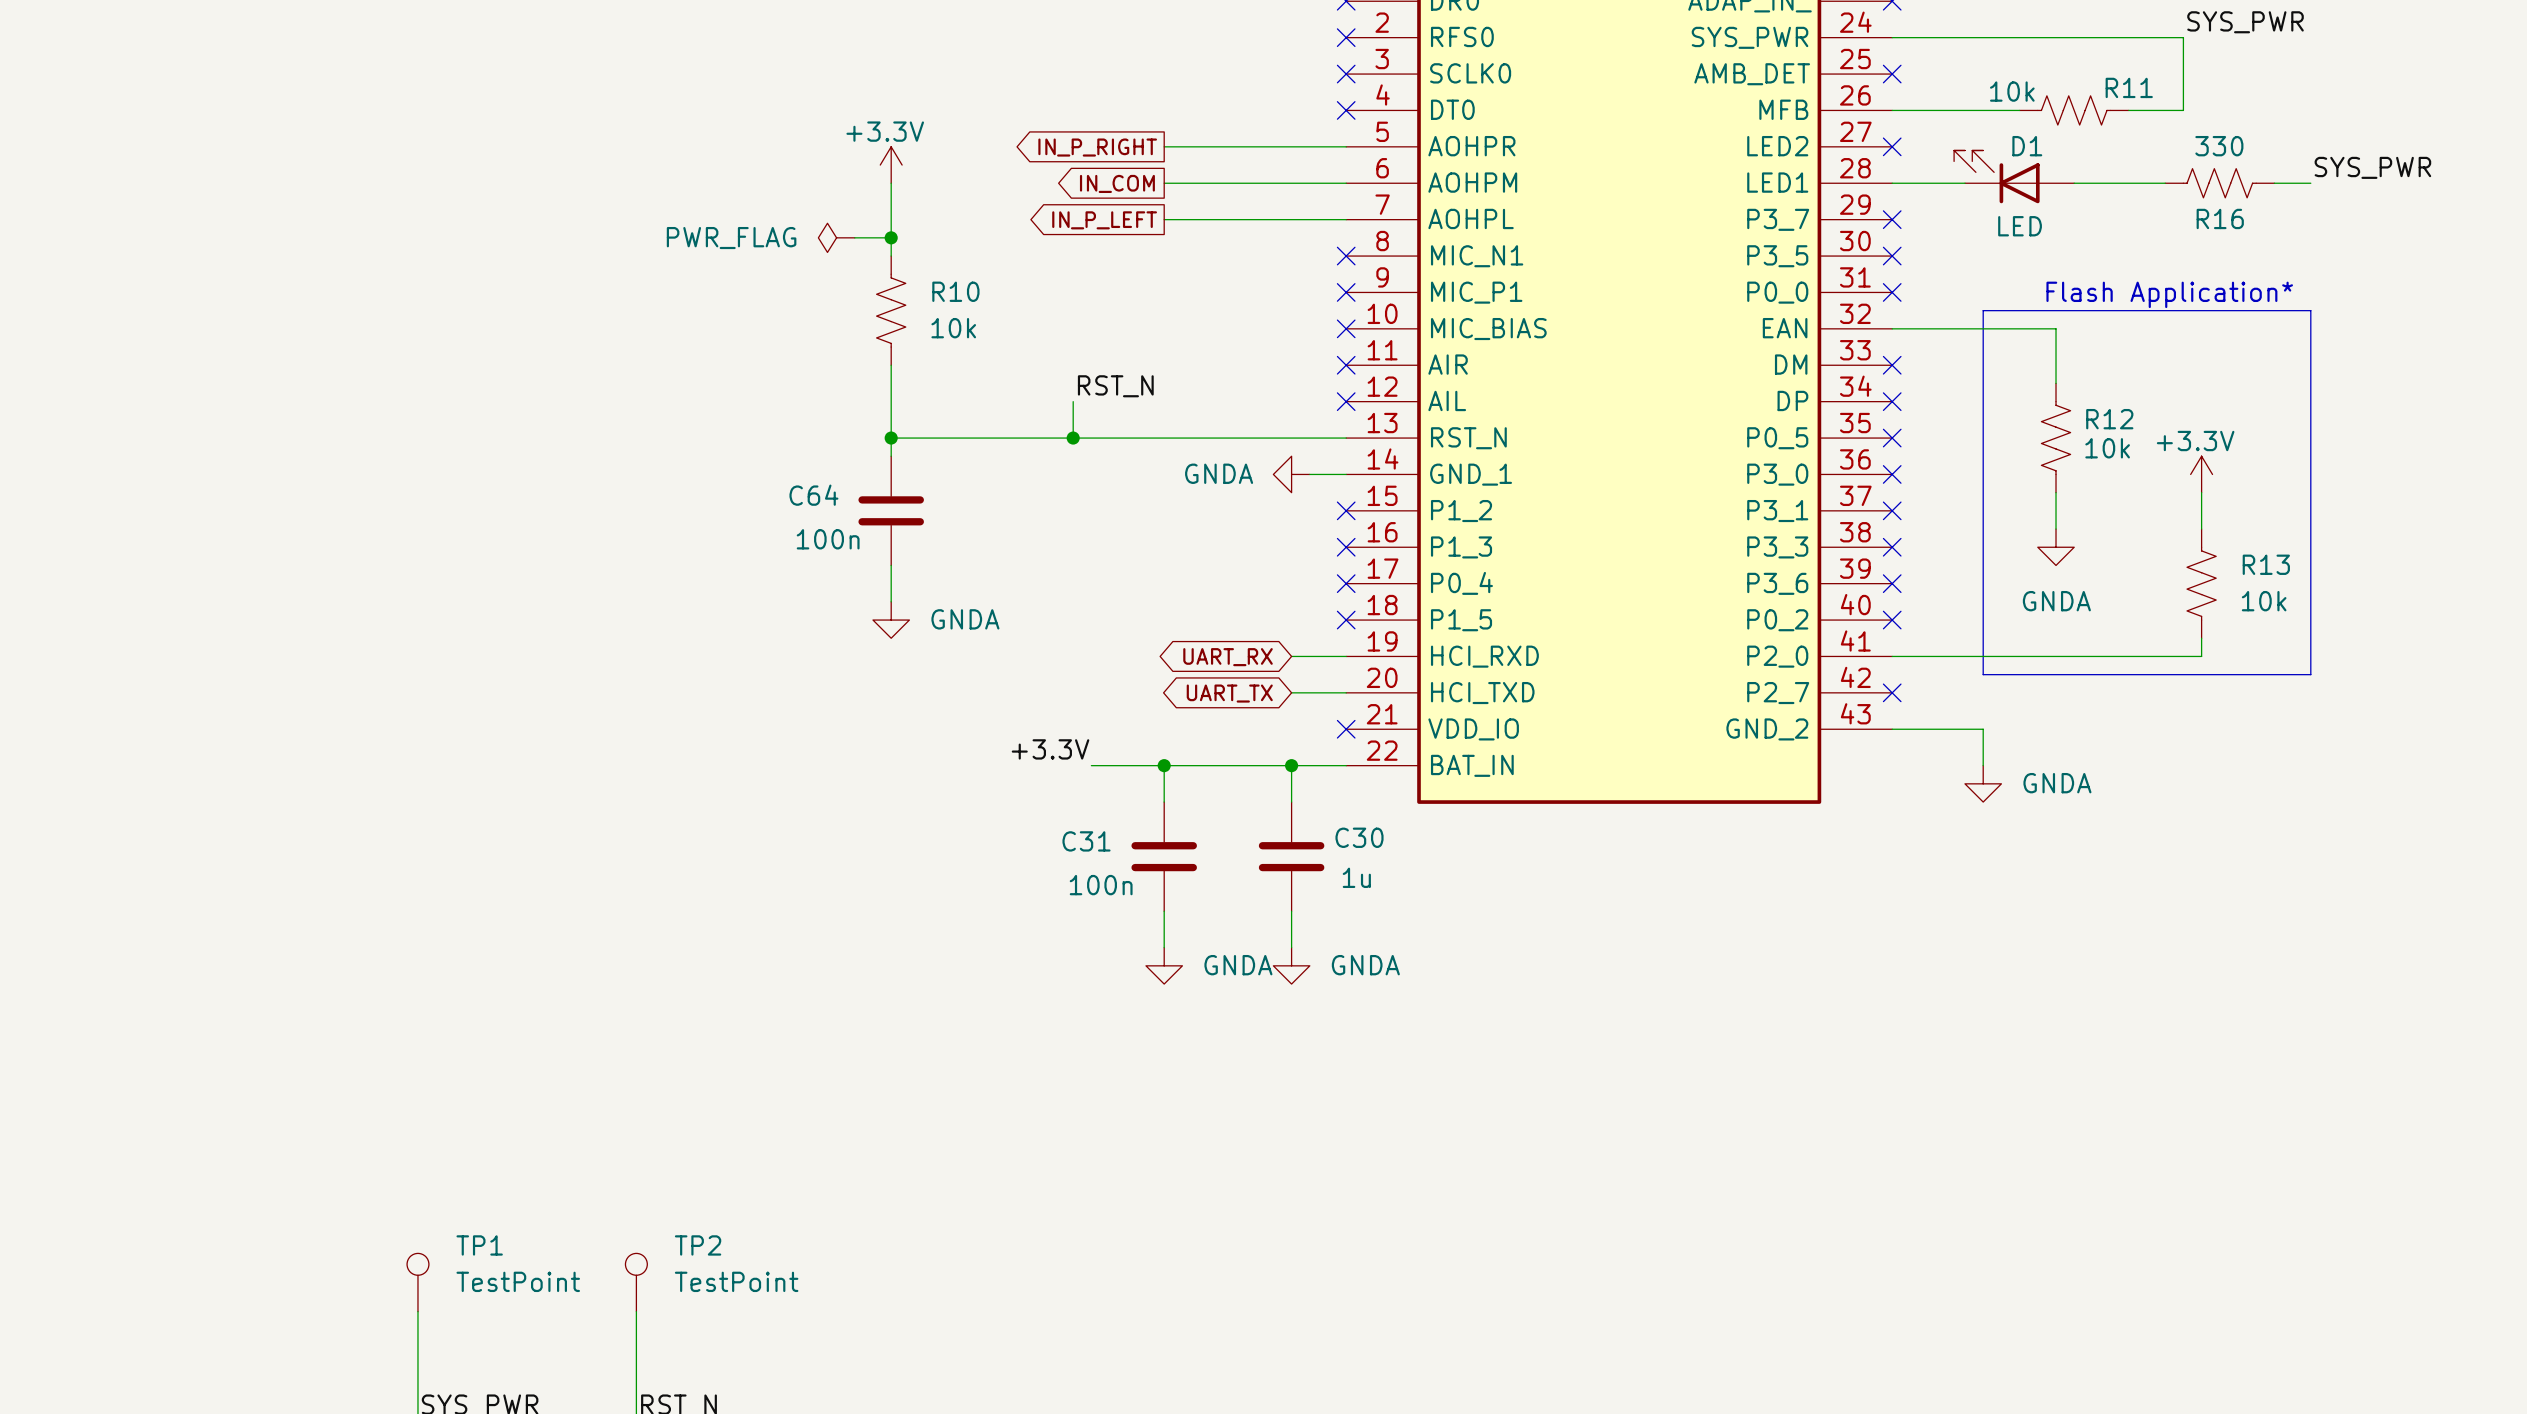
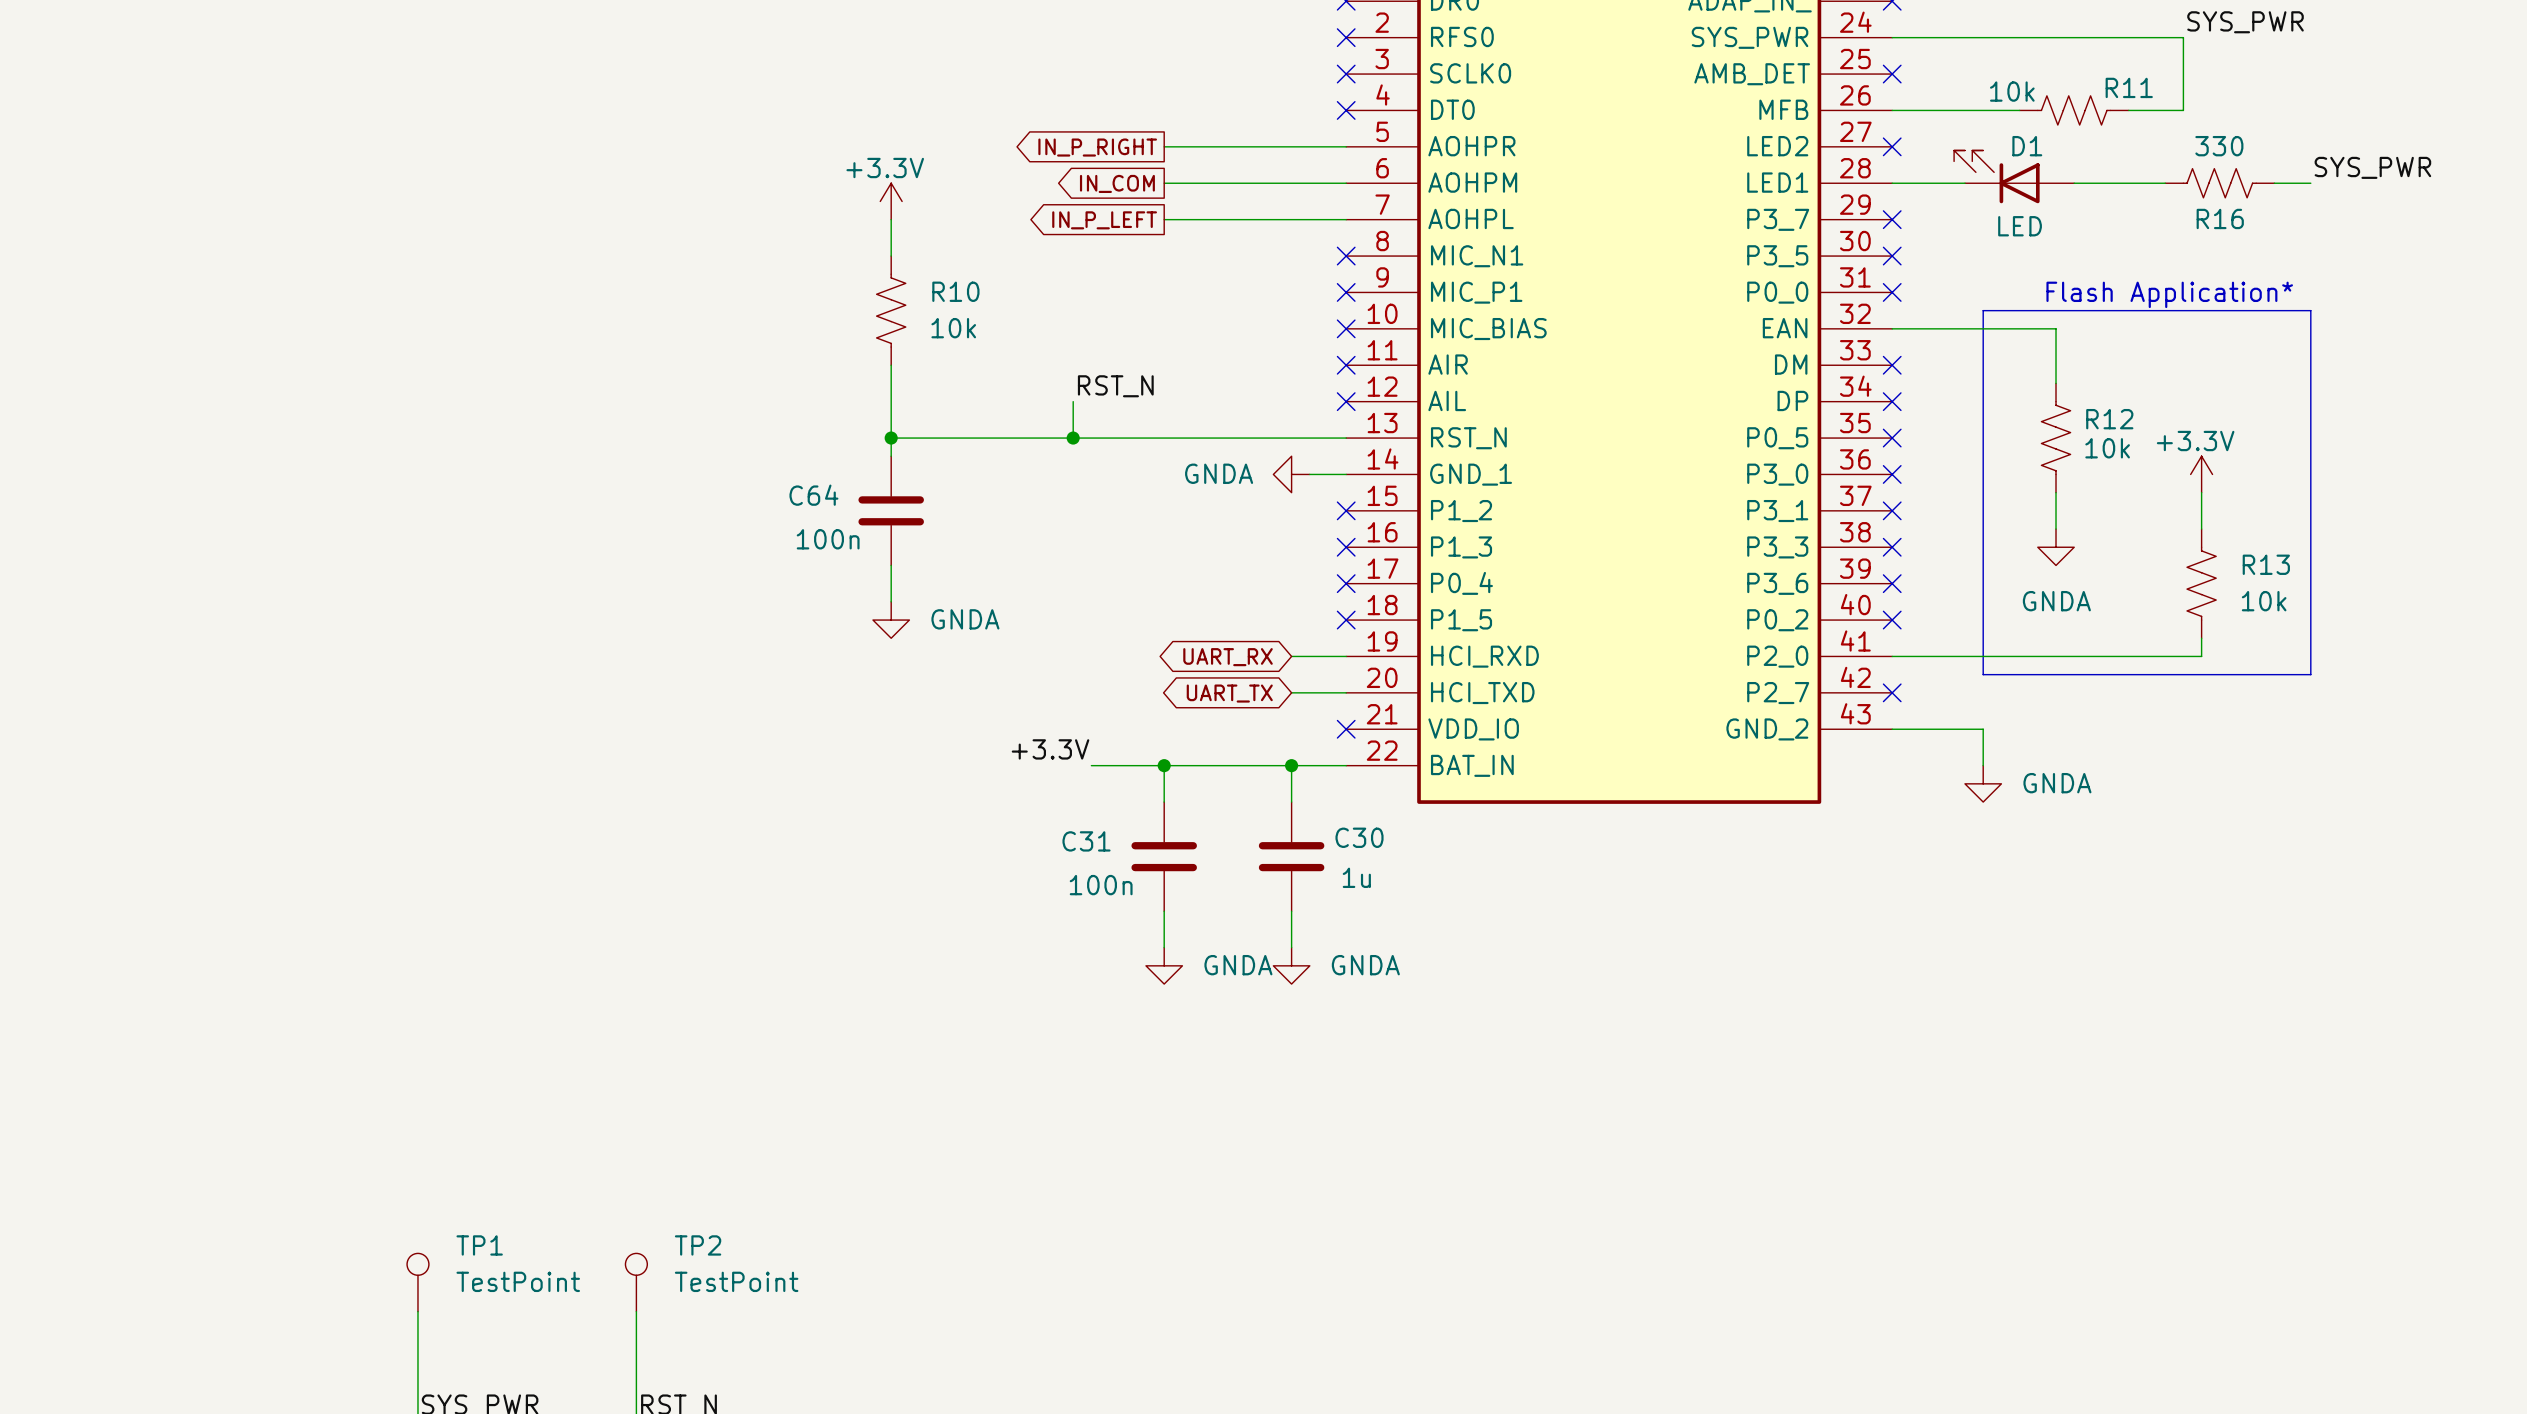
power symbol position: +3.3V (891, 165) -> +3.3V (891, 201)
power symbol: PWR_FLAG (836, 237) -> none
wire: (854, 237) (891, 237) -> none
junction: (891, 237) -> none

